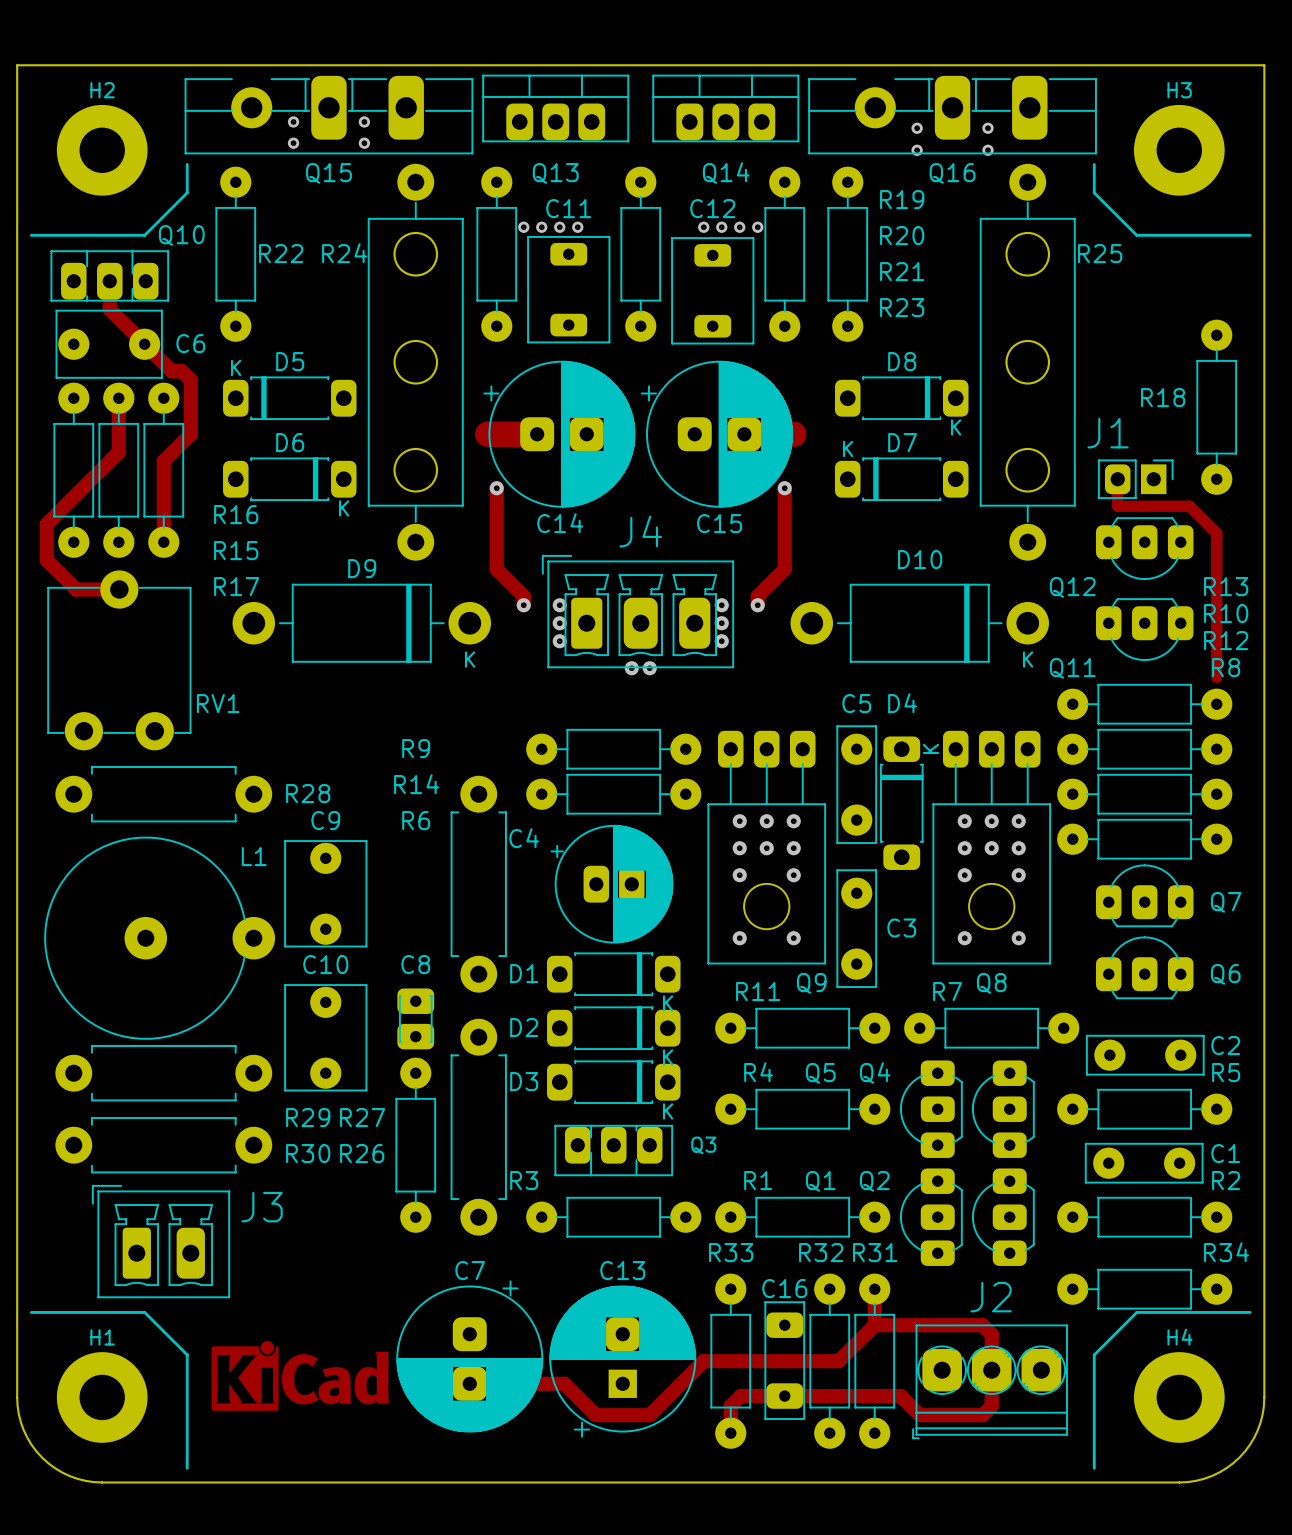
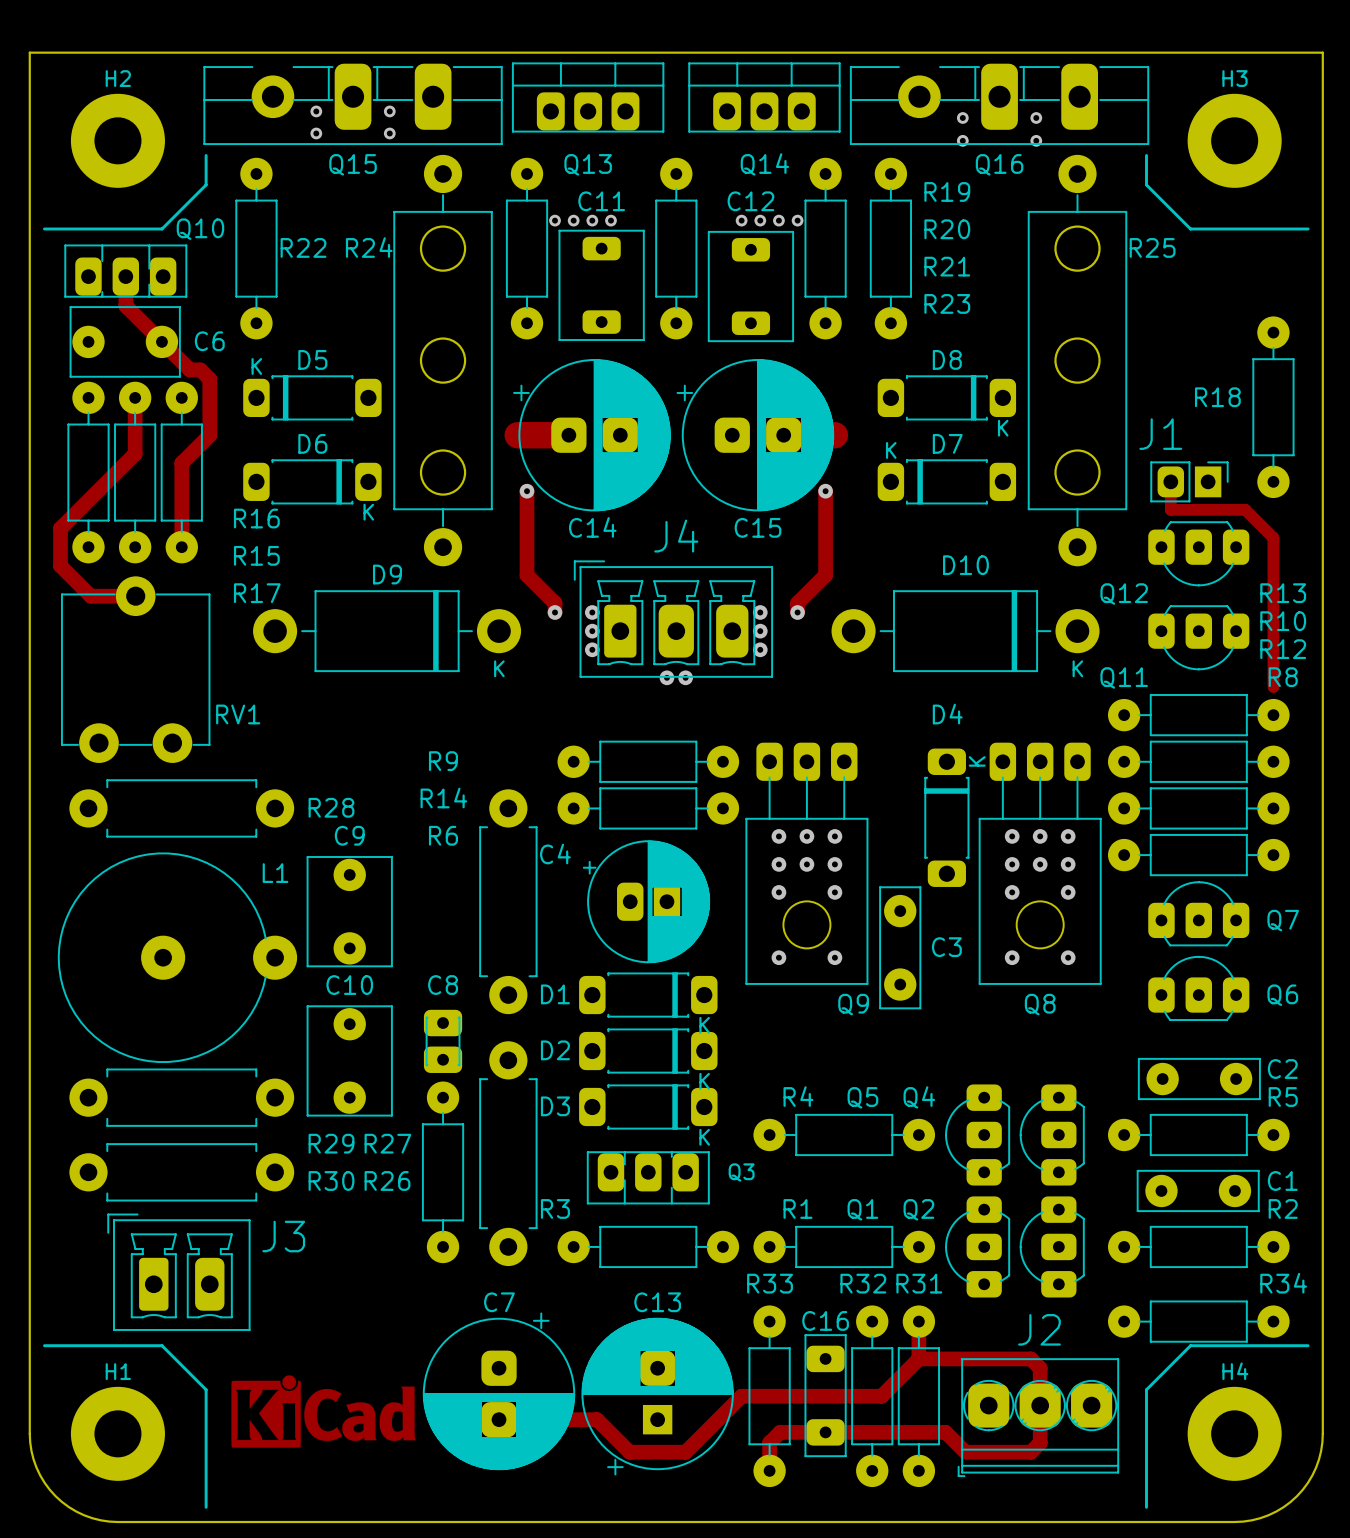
C5: (856, 784) -> none
R11: (802, 1028) -> none
R7: (991, 1028) -> none

